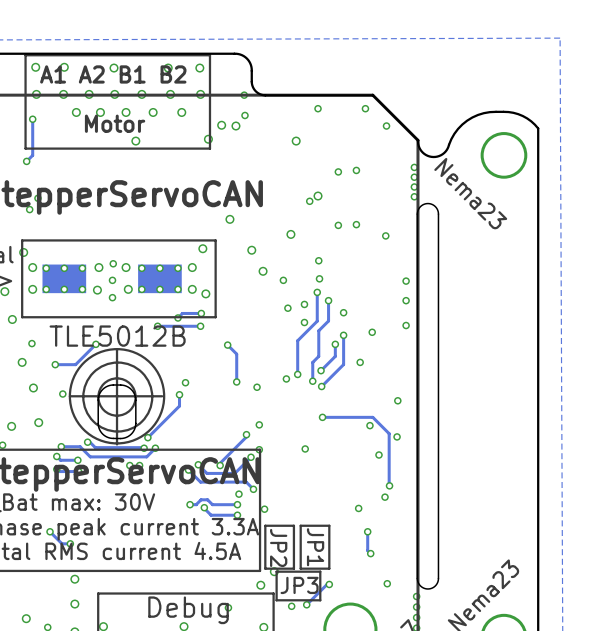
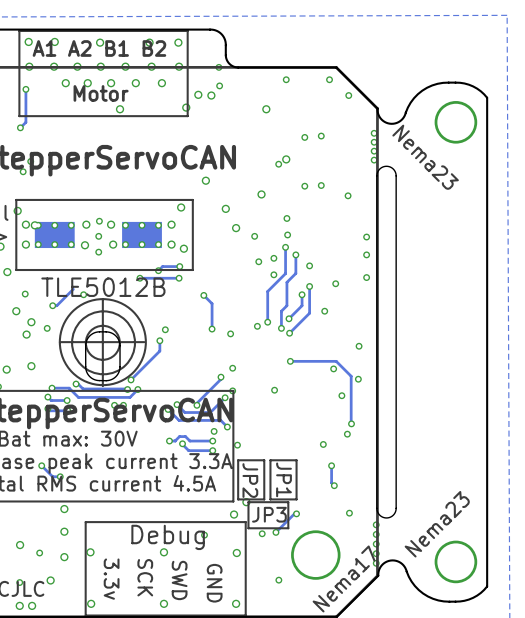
via: none -> (34, 225)
track: none -> (73, 289) (56, 305) (52, 305)
track: (95, 344) (75, 364) (55, 364) -> none
via: none -> (52, 305)
via: (55, 364) -> none
via: none -> (31, 322)
via: none -> (47, 328)
via: (62, 394) -> none

